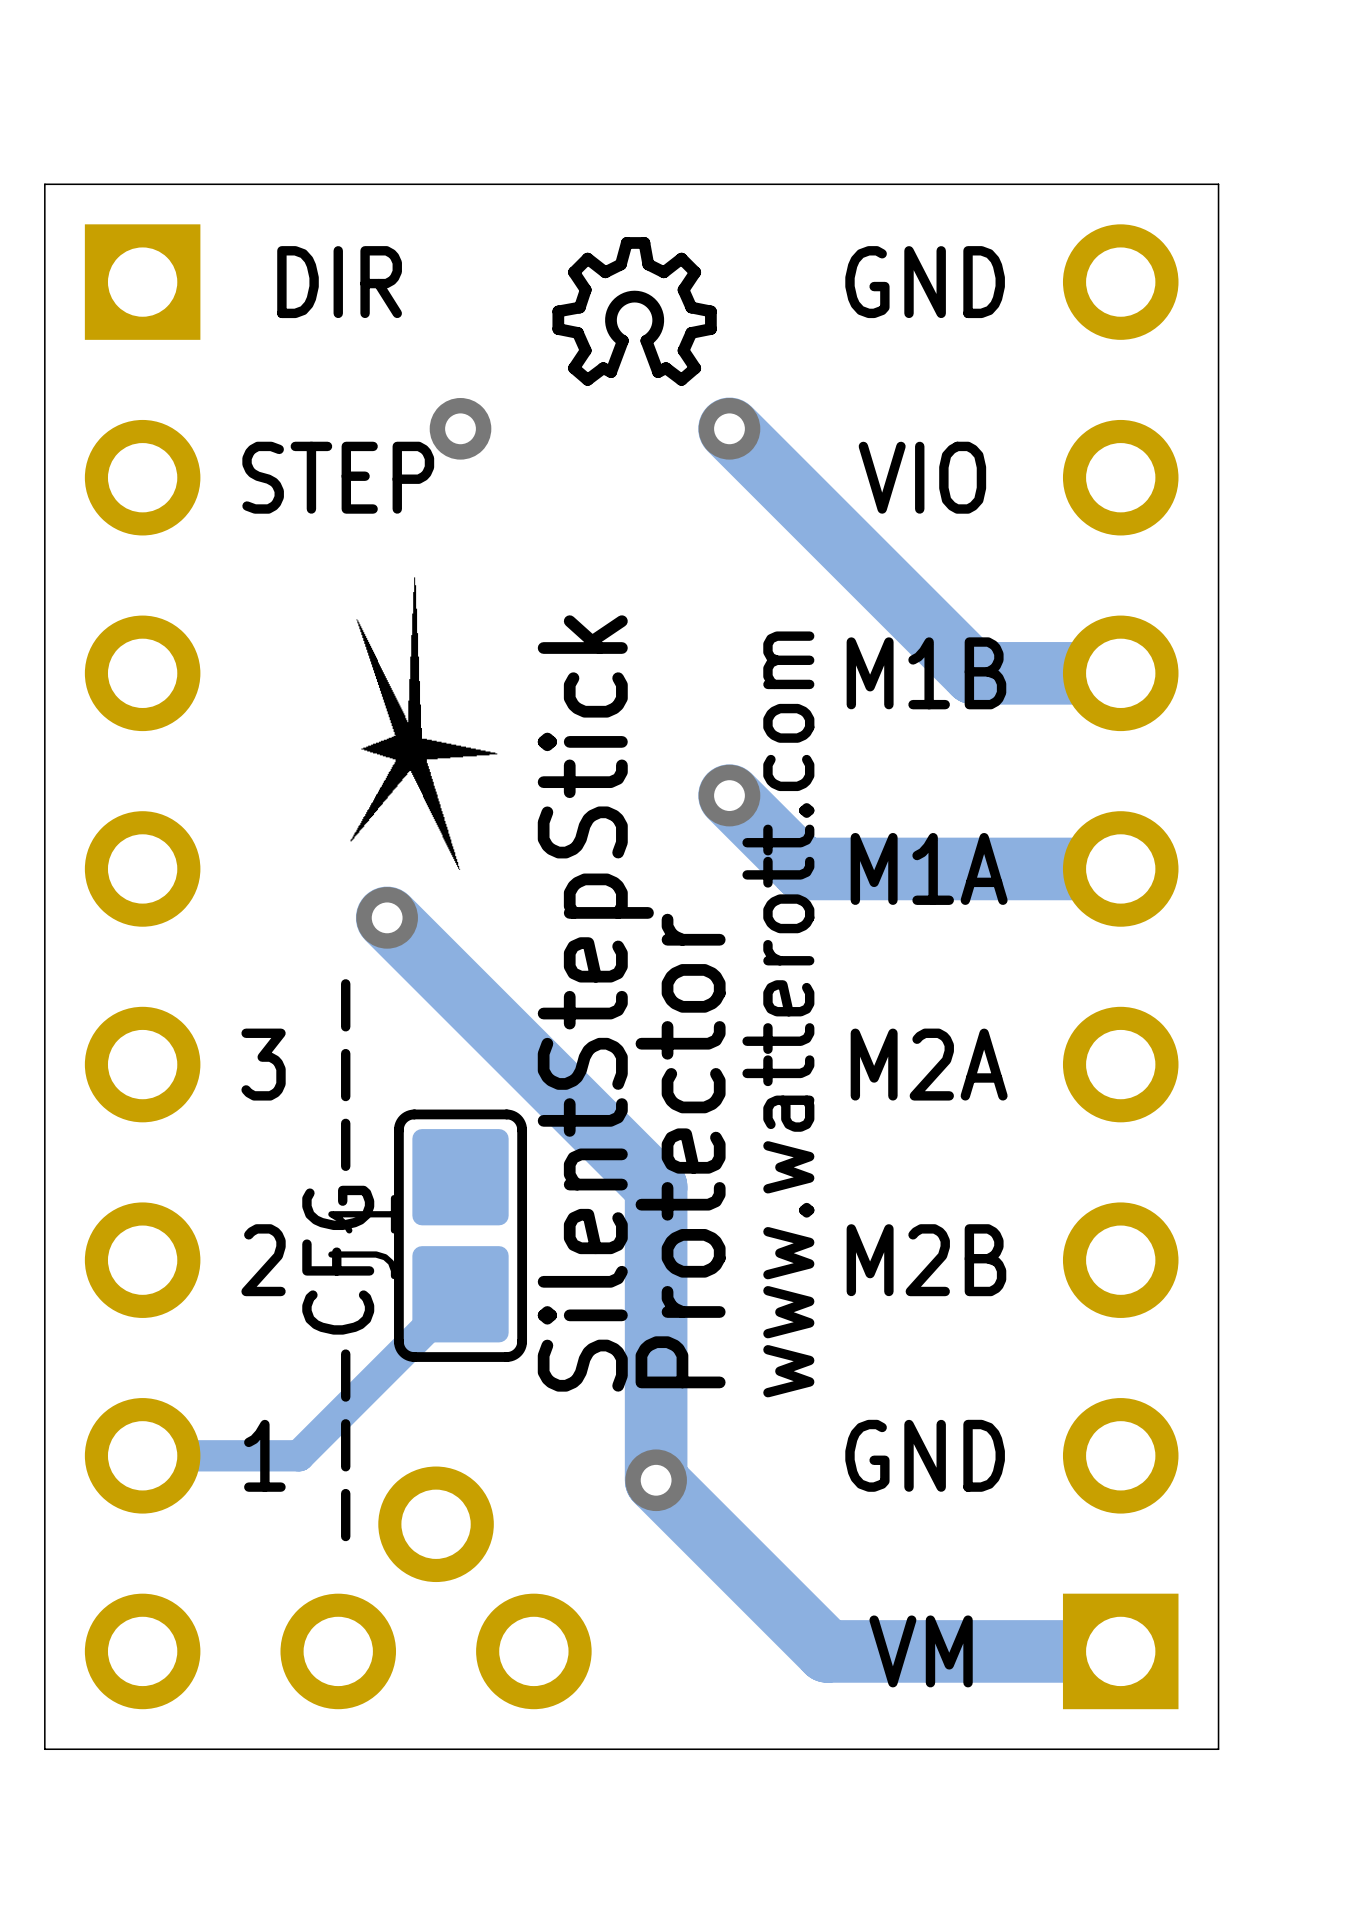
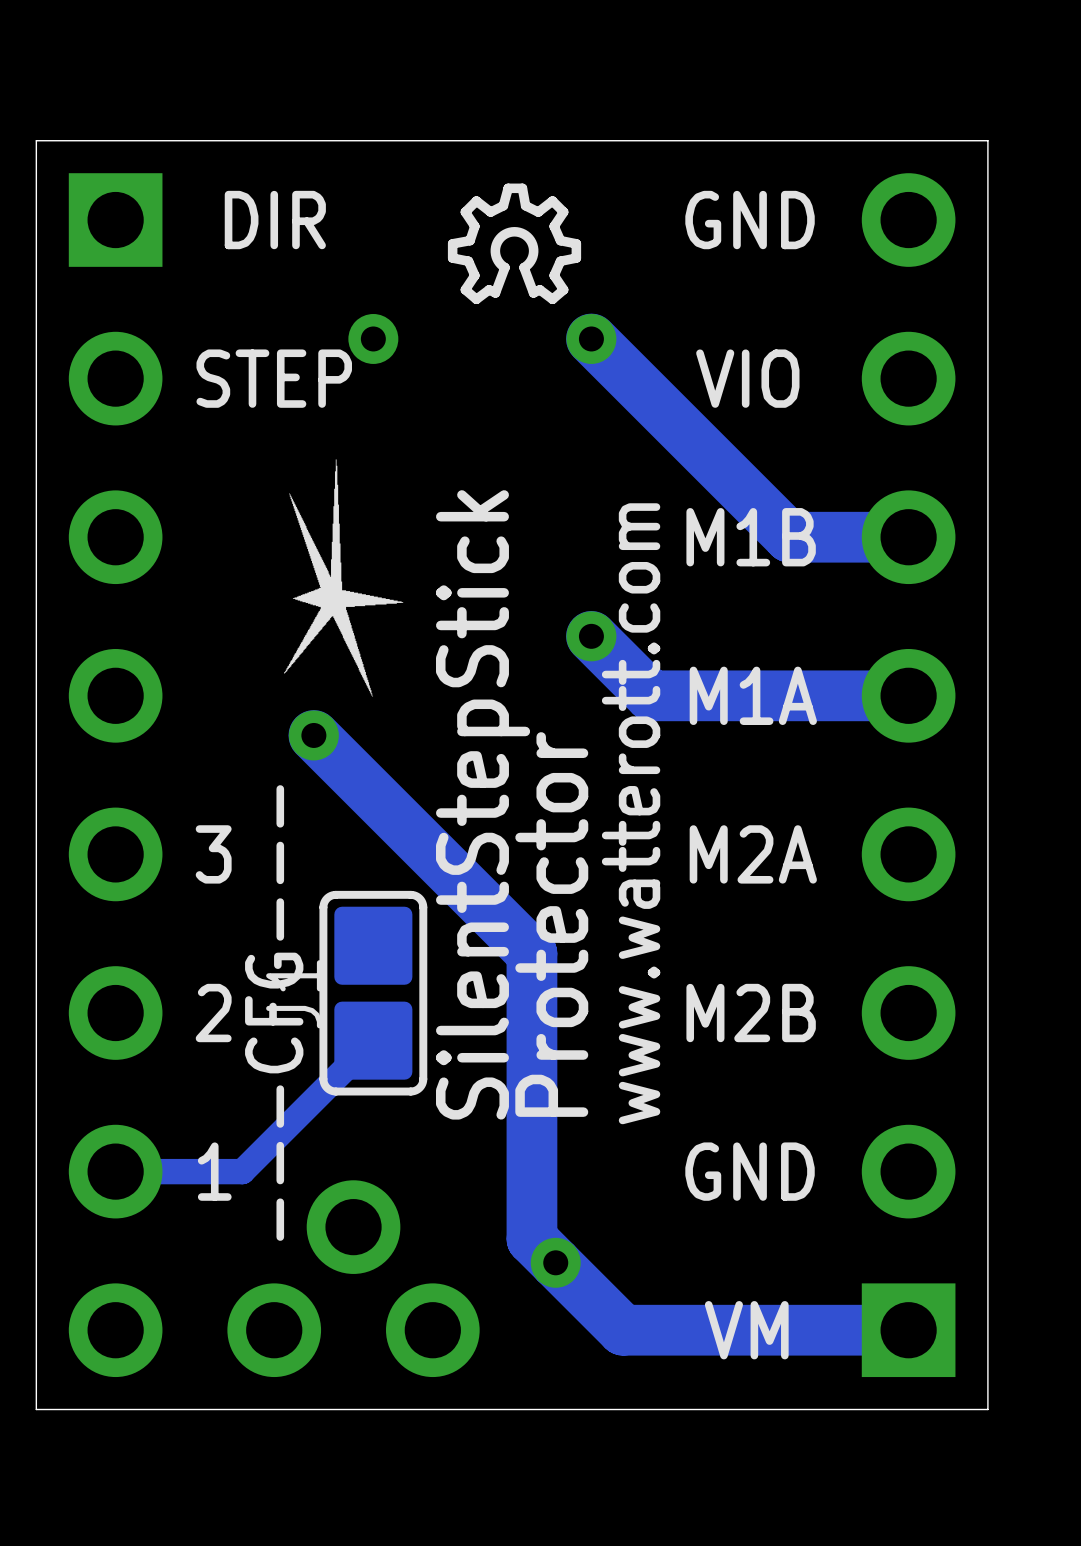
track: (656, 1480) (827, 1651) -> (531, 1191) (531, 1239) (623, 1330) (670, 1330)
via position: (656, 1480) -> (555, 1262)

